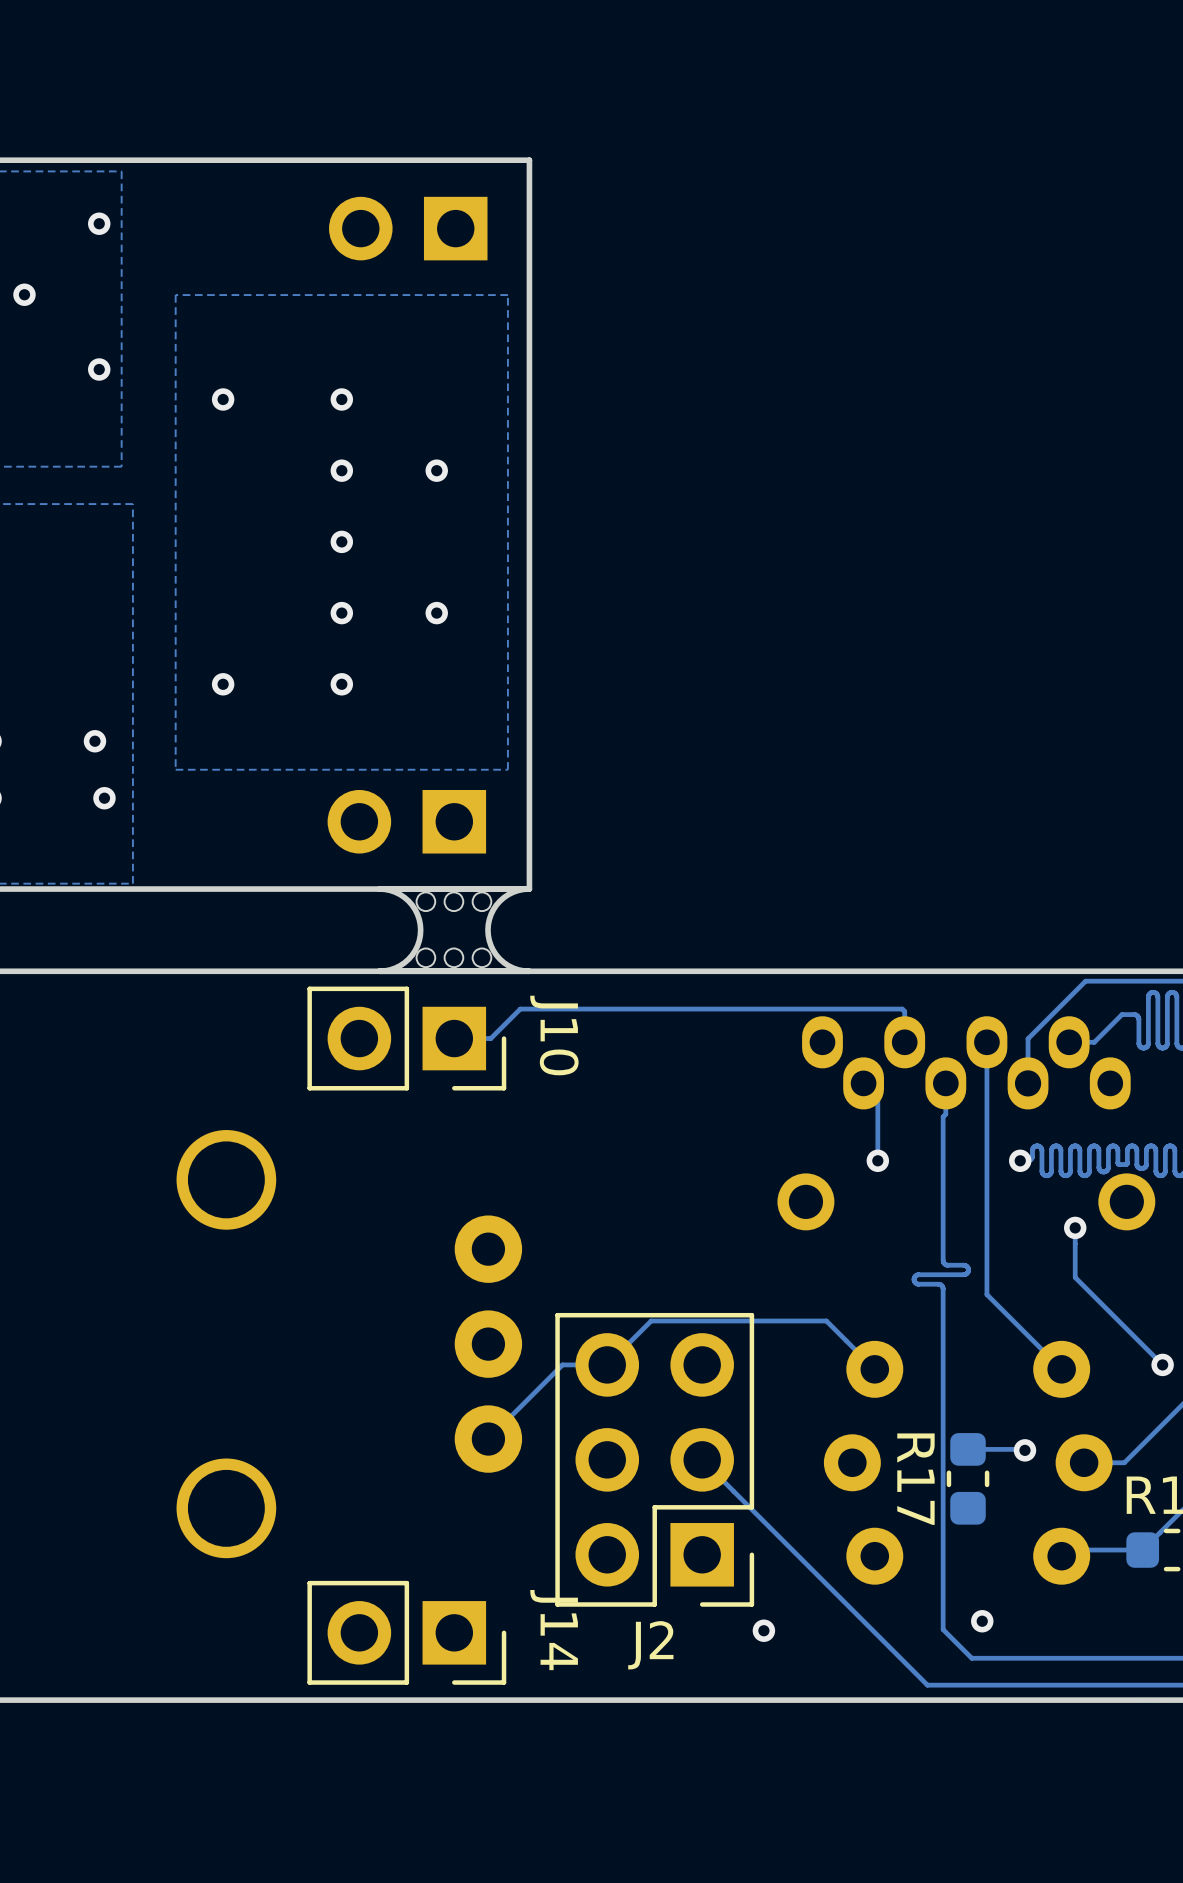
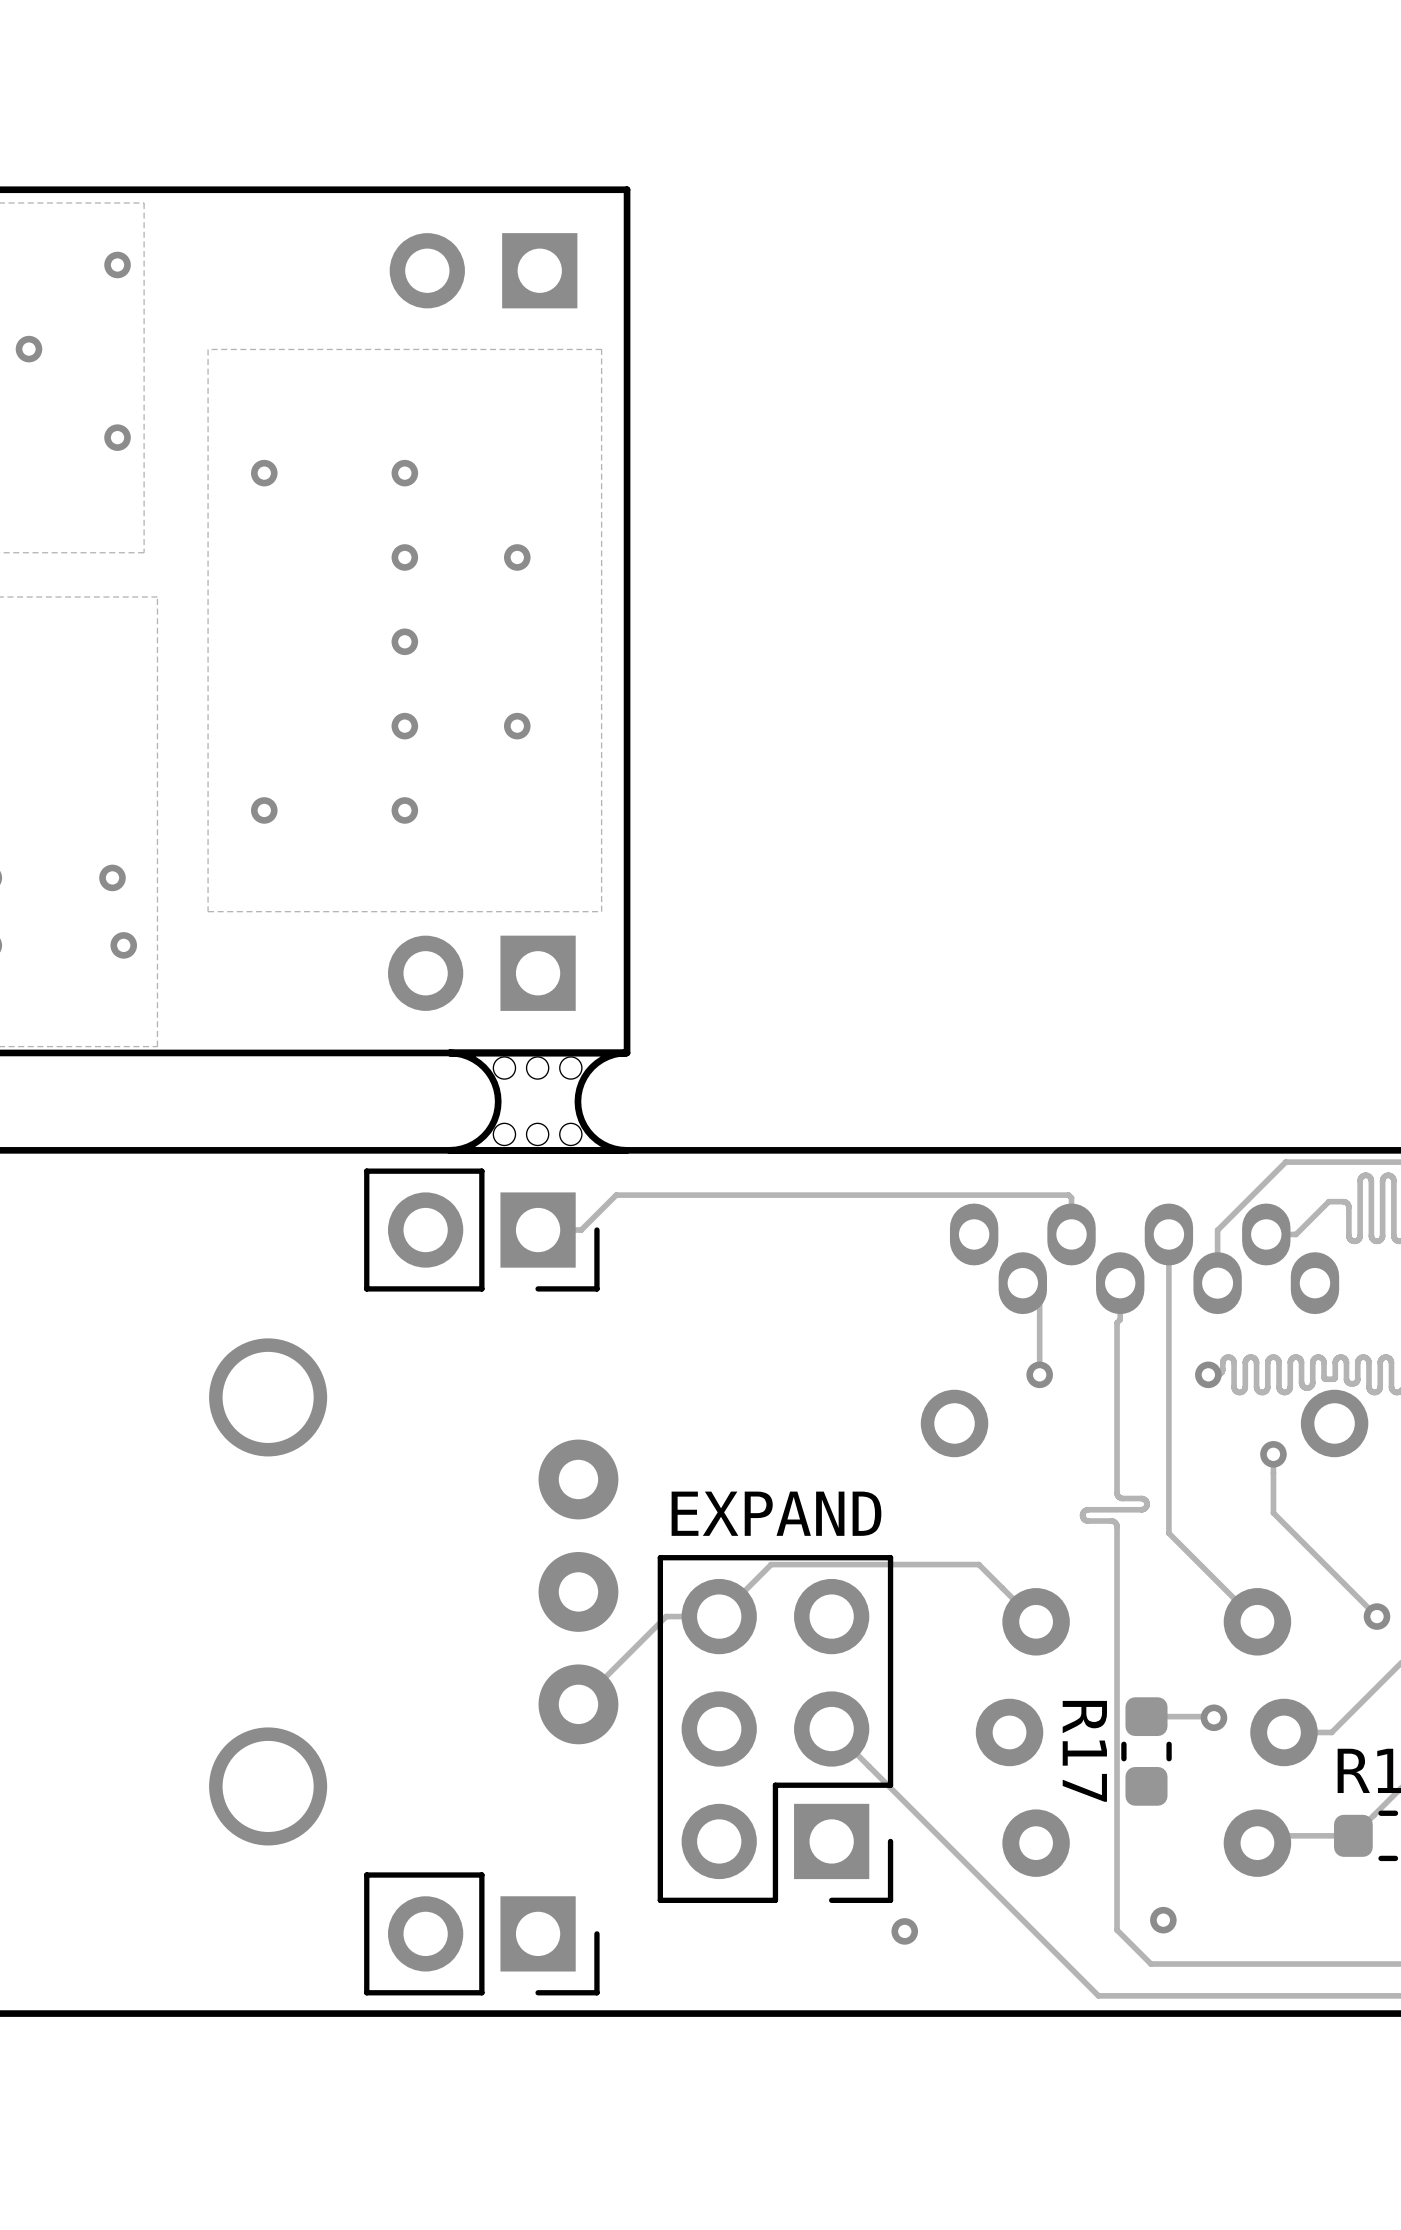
J10 name: J10 (554, 1035) -> none
J14 name: J14 (554, 1630) -> none
J2 name: J2 (650, 1645) -> EXPAND (776, 1513)

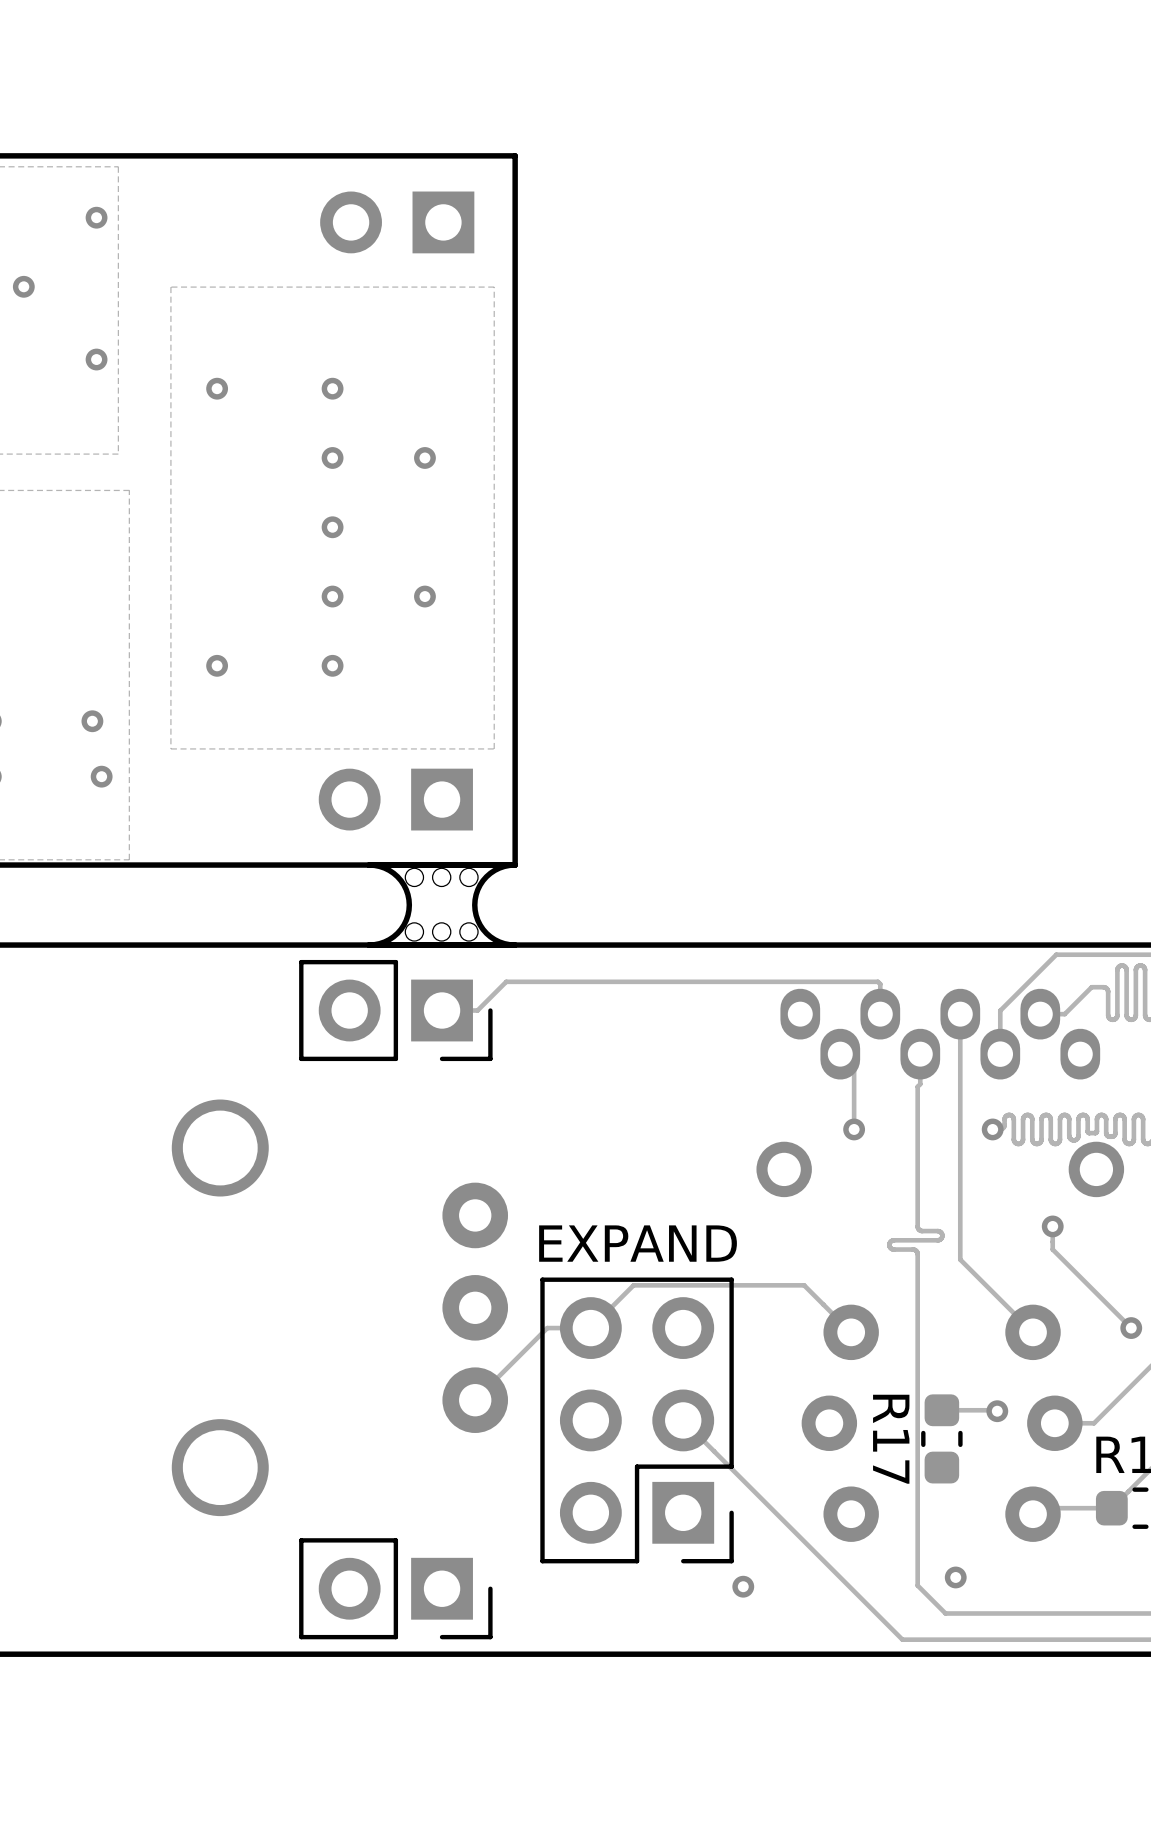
track: (1273, 1454) (1273, 1513) (1281, 1521) -> (1052, 1226) (1052, 1249)
via position: (1273, 1454) -> (1052, 1226)

